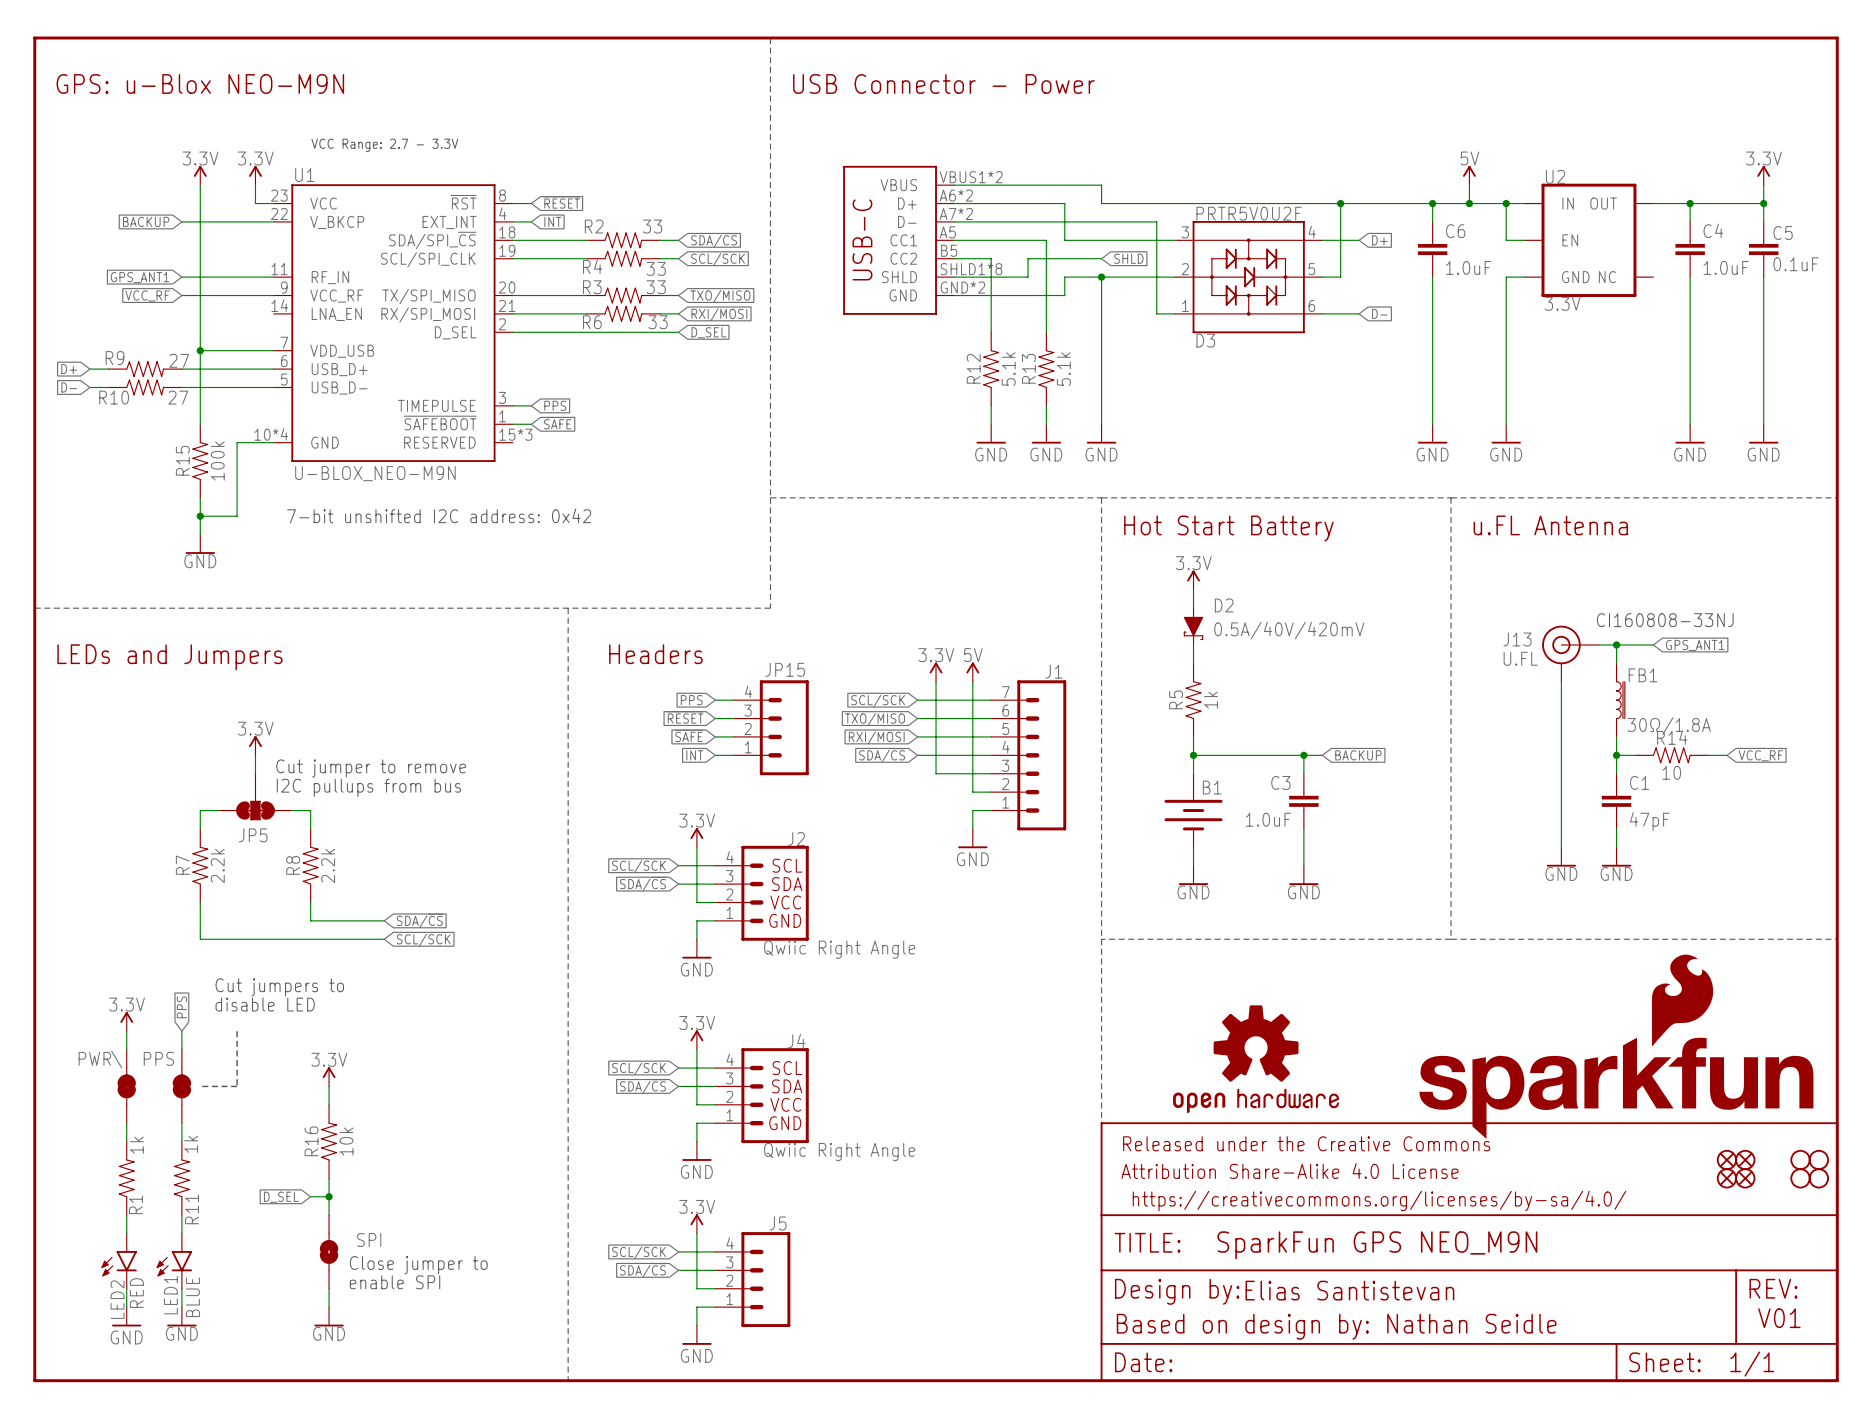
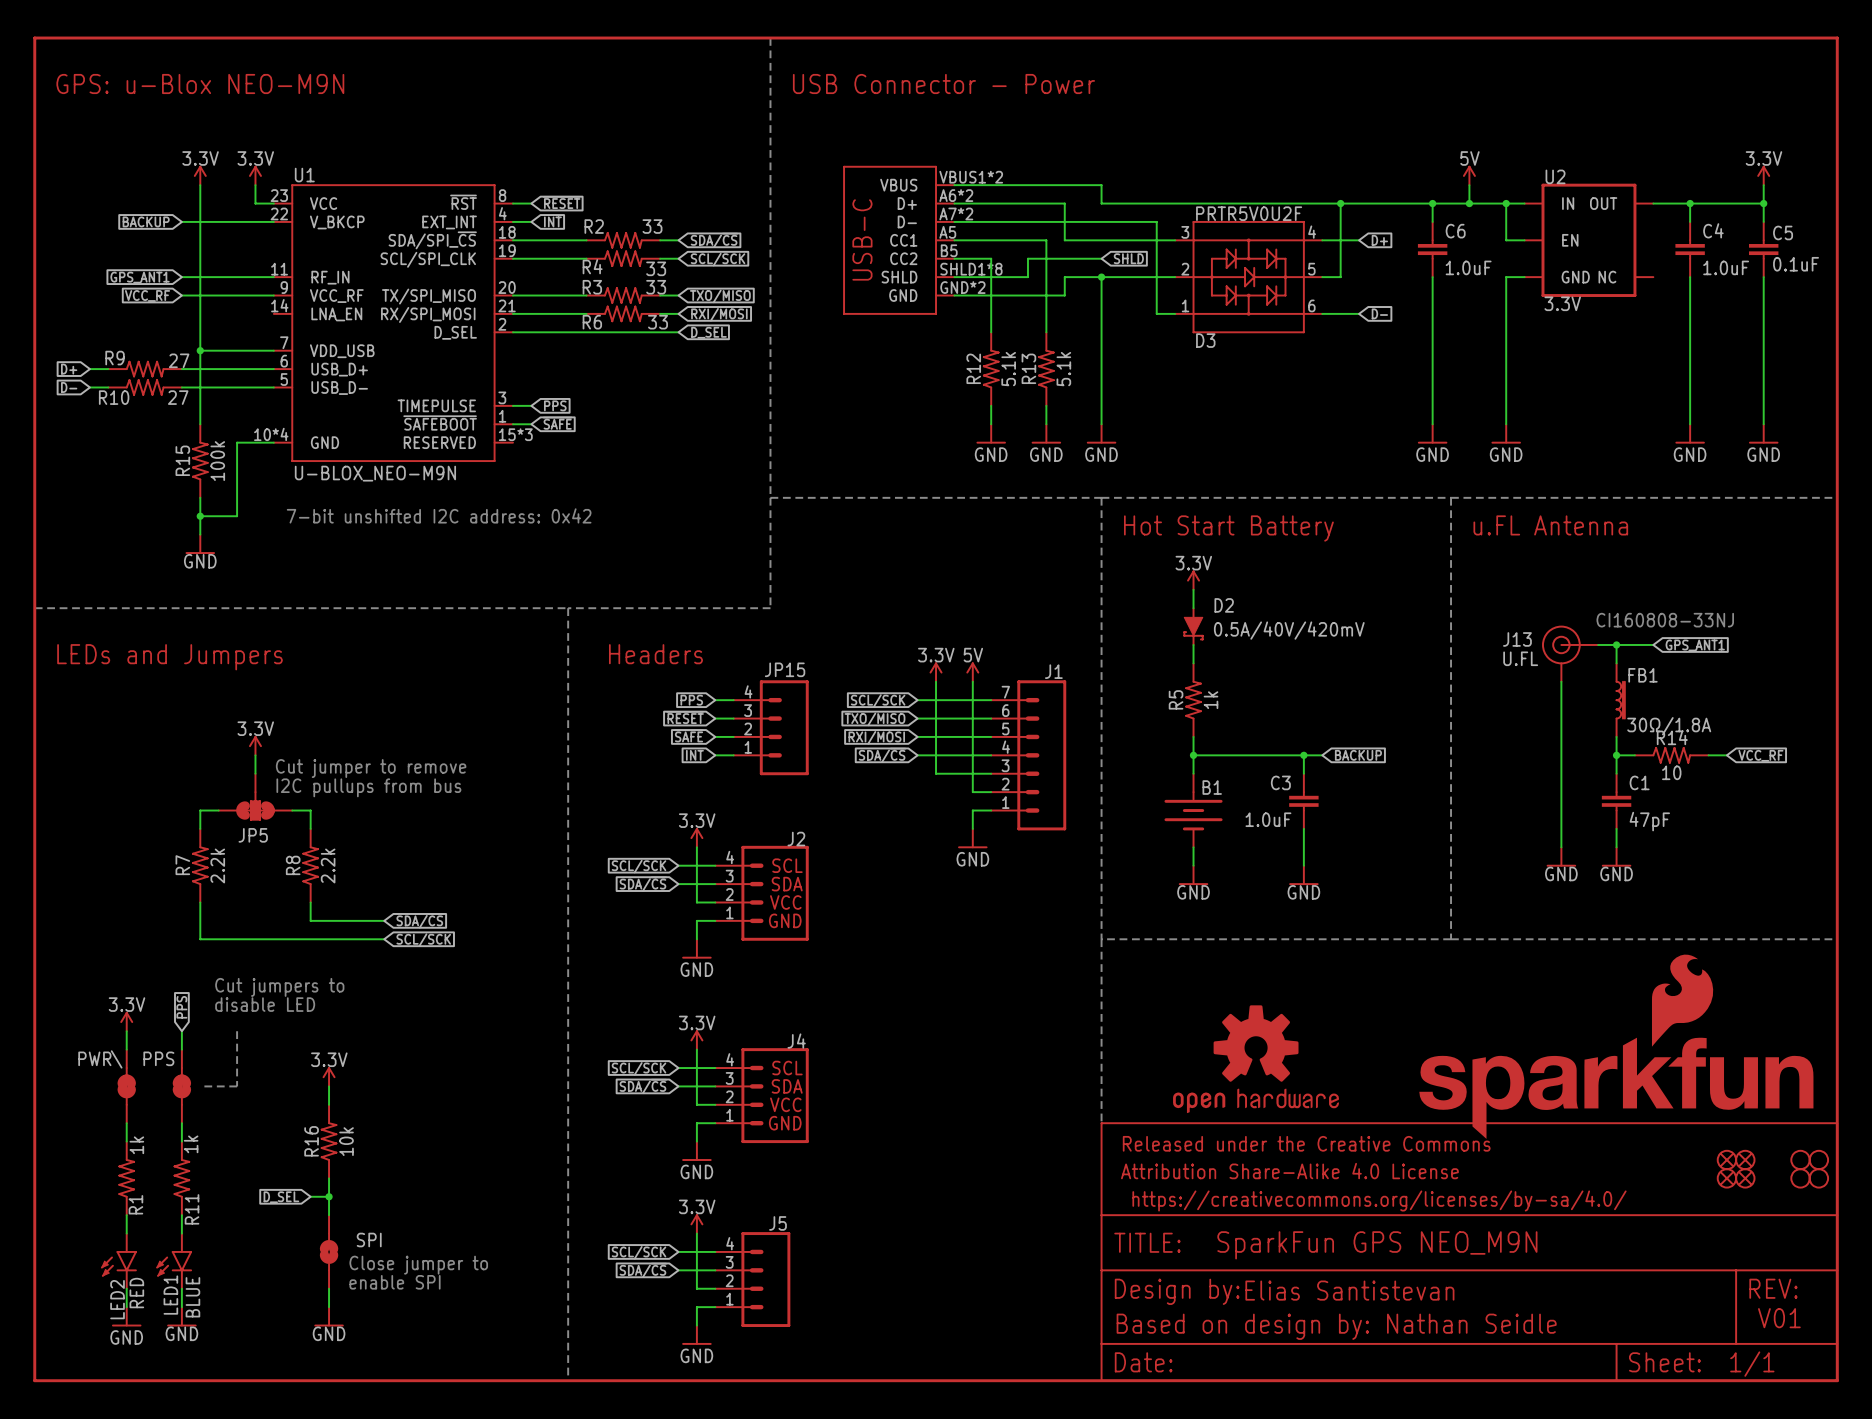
text: VCC Range: 2.7 - 3.3V (384, 145) -> none
J2 value: Qwiic Right Angle (839, 949) -> none
J4 value: Qwiic Right Angle (839, 1152) -> none

